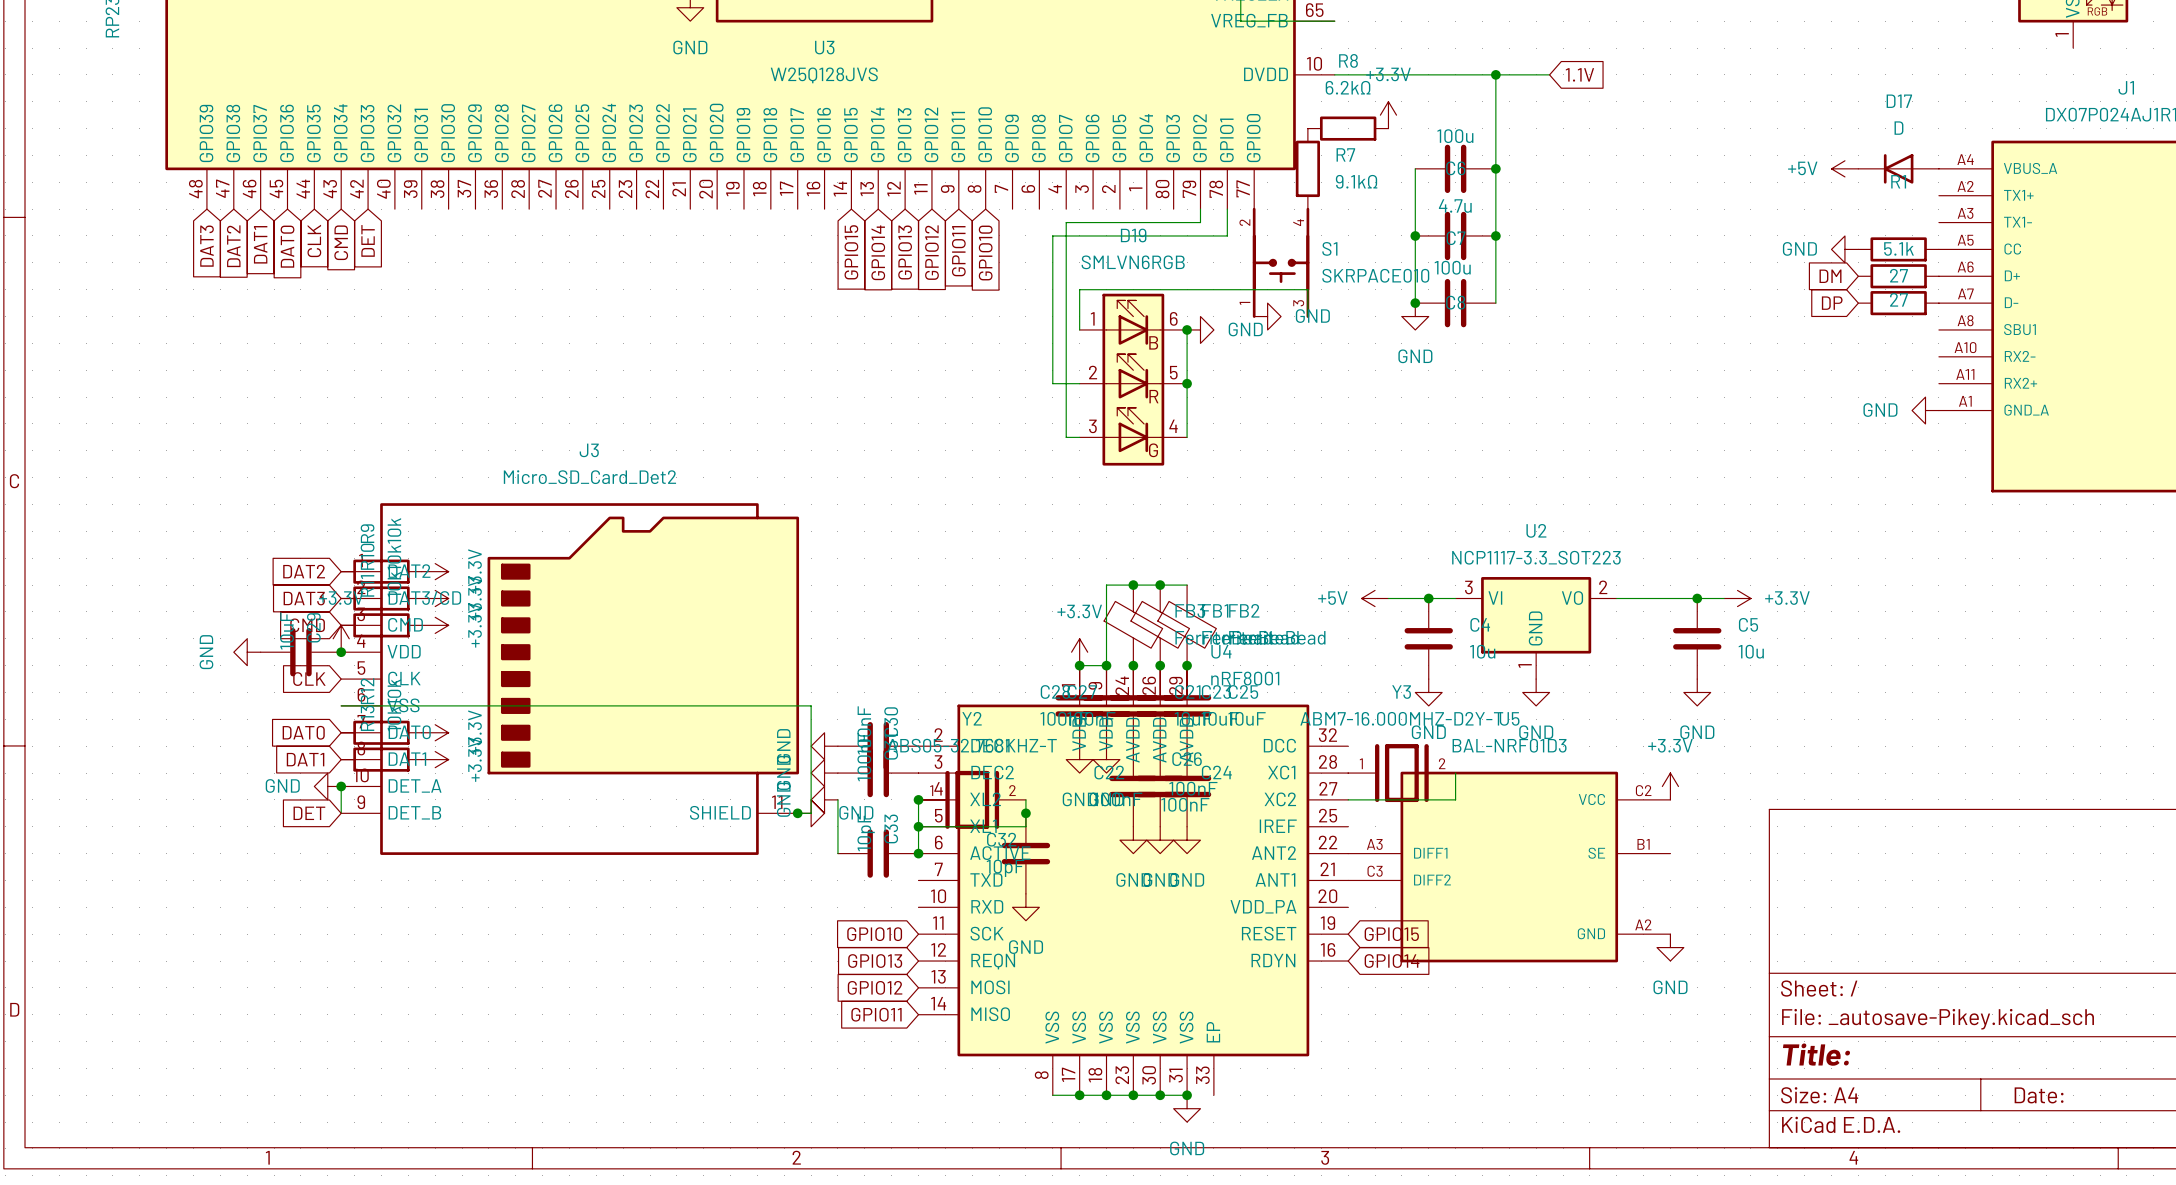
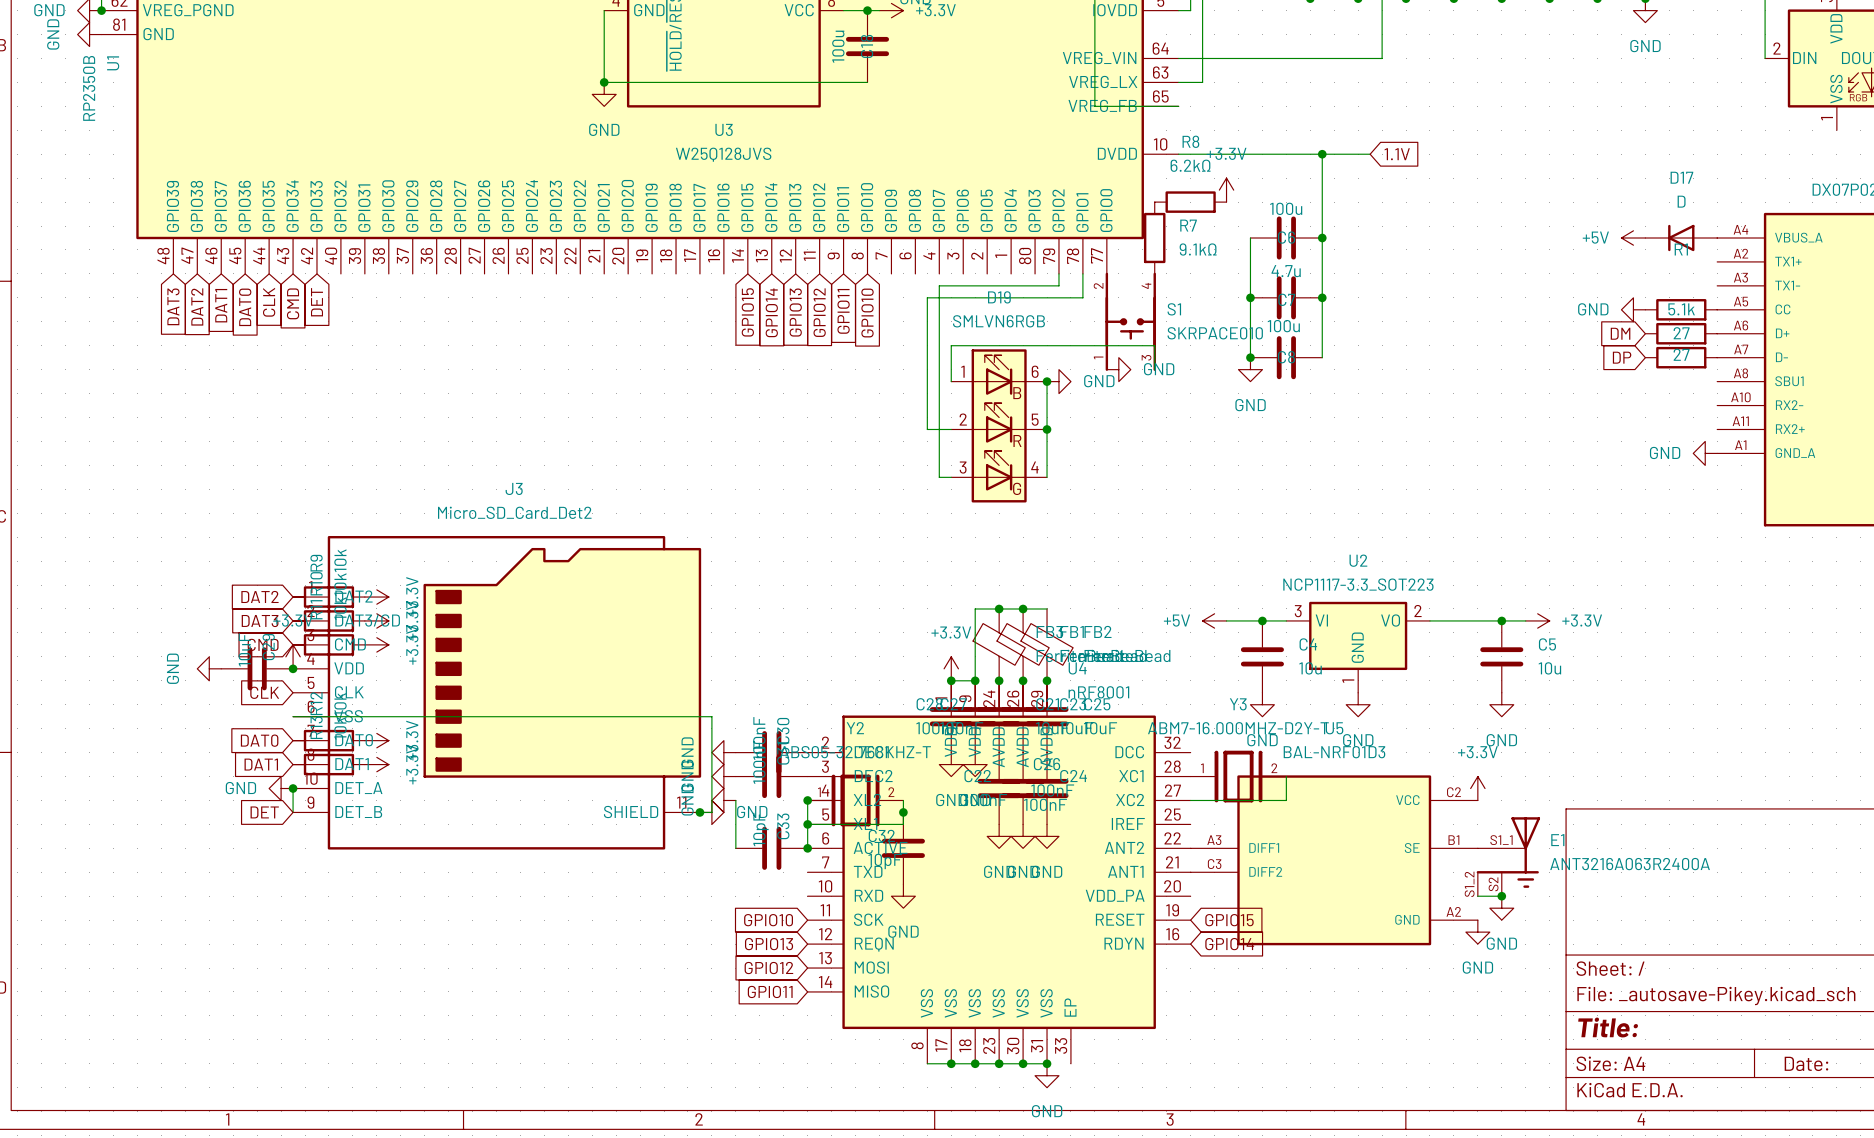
E1: none -> ANT3216A063R2400A (1508, 856)
wire: none -> (1477, 896) (1501, 896)
junction: none -> (1501, 896)
power symbol: none -> GND (1501, 908)

